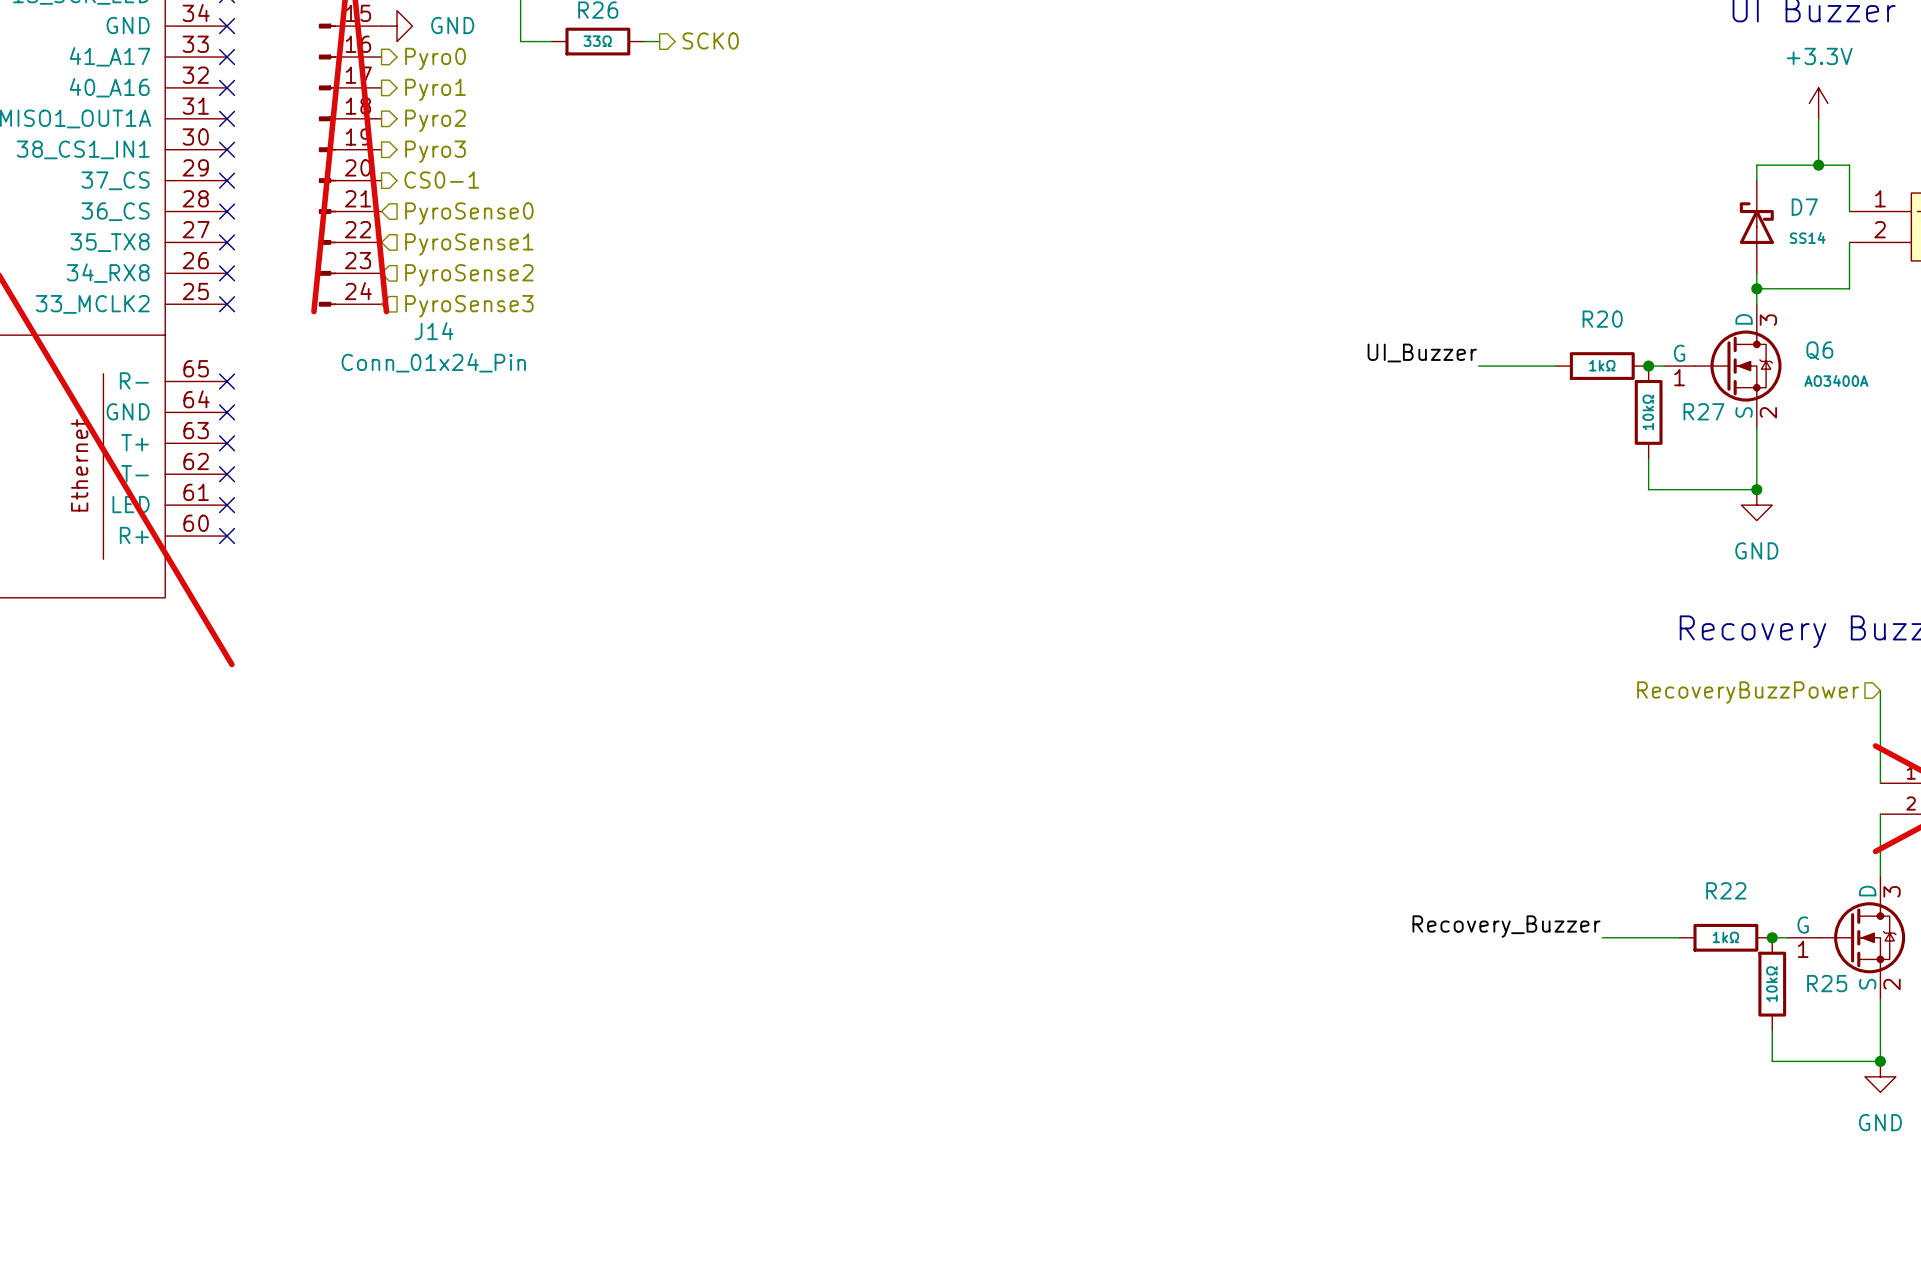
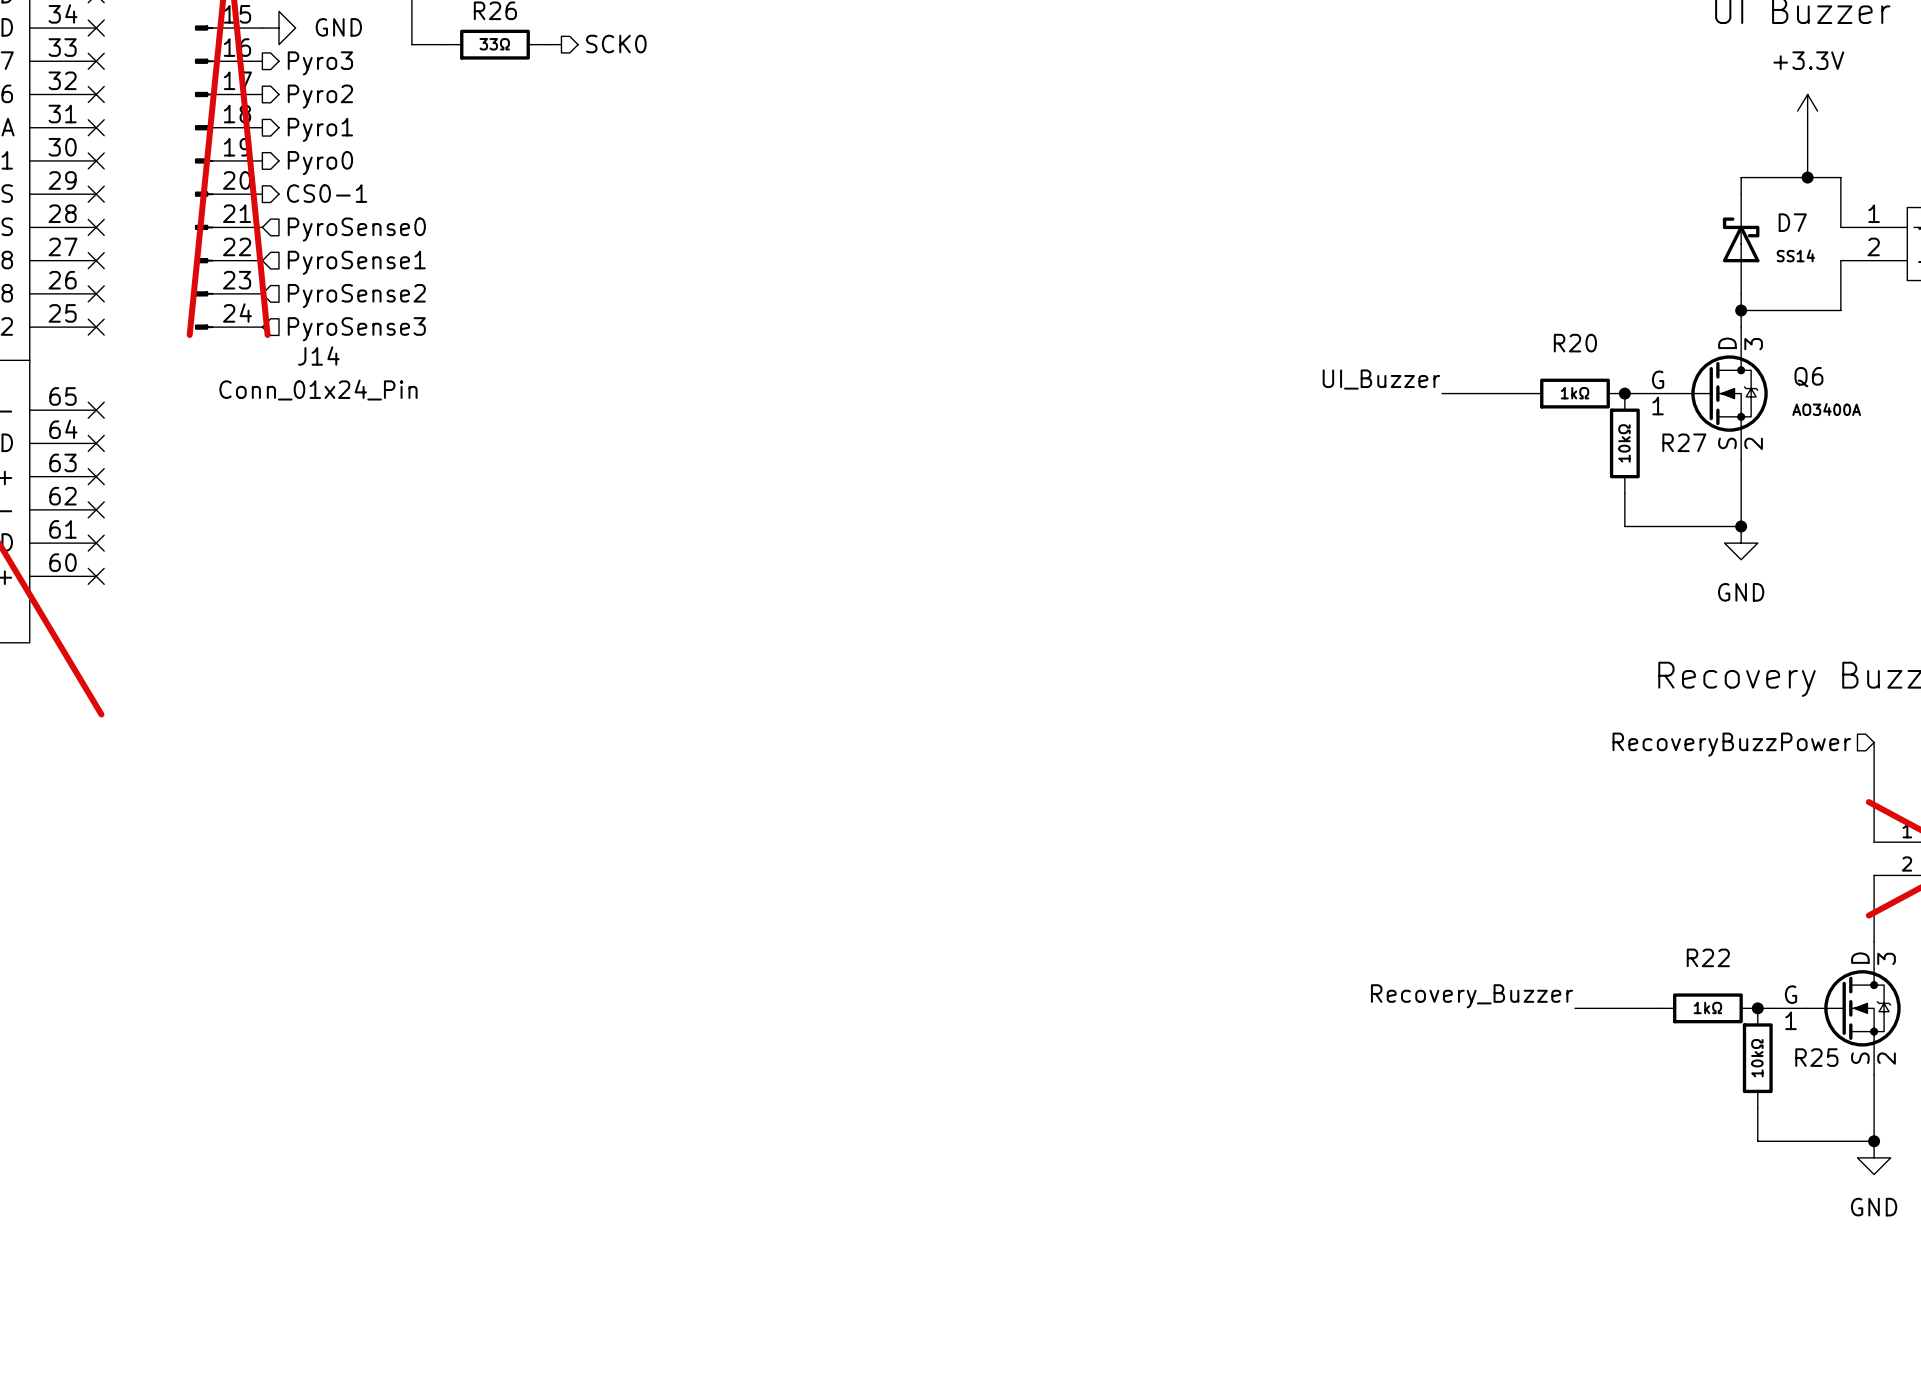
hierarchical label: Pyro0 (435, 59) -> Pyro3 (320, 63)
hierarchical label: Pyro1 (435, 89) -> Pyro2 (320, 96)
hierarchical label: Pyro2 (435, 120) -> Pyro1 (320, 129)
hierarchical label: Pyro3 (435, 151) -> Pyro0 (320, 163)

